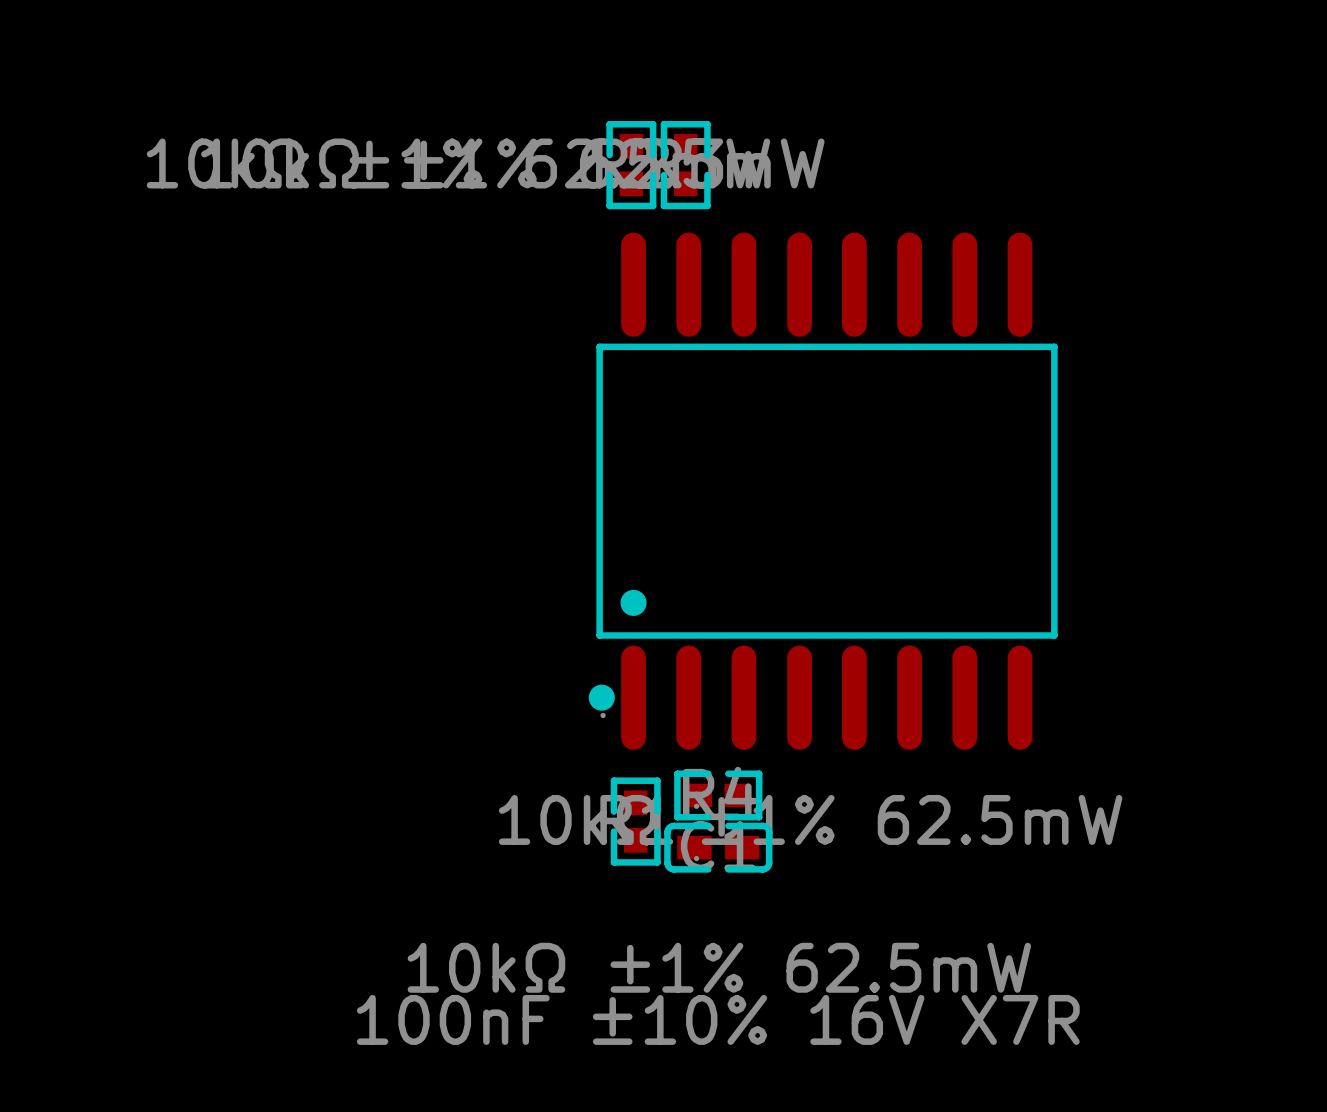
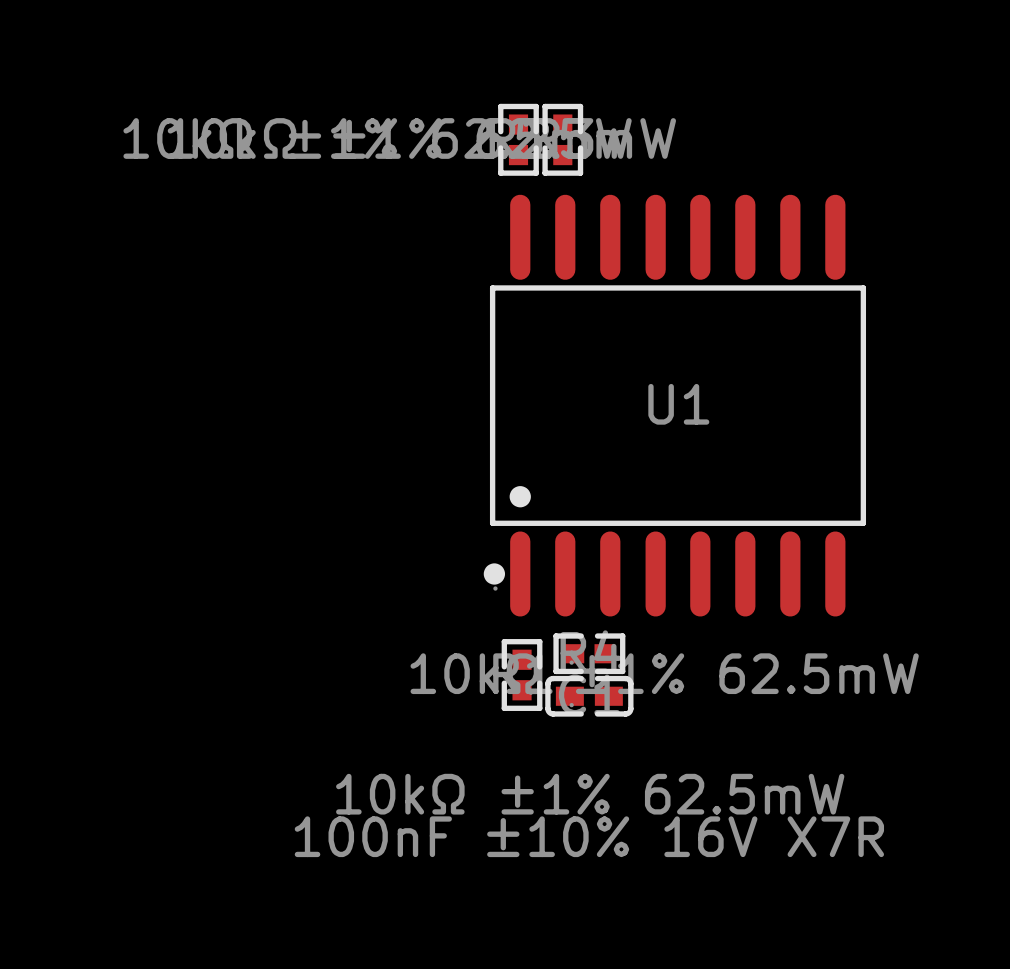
U1 name: none -> U1 (678, 404)

